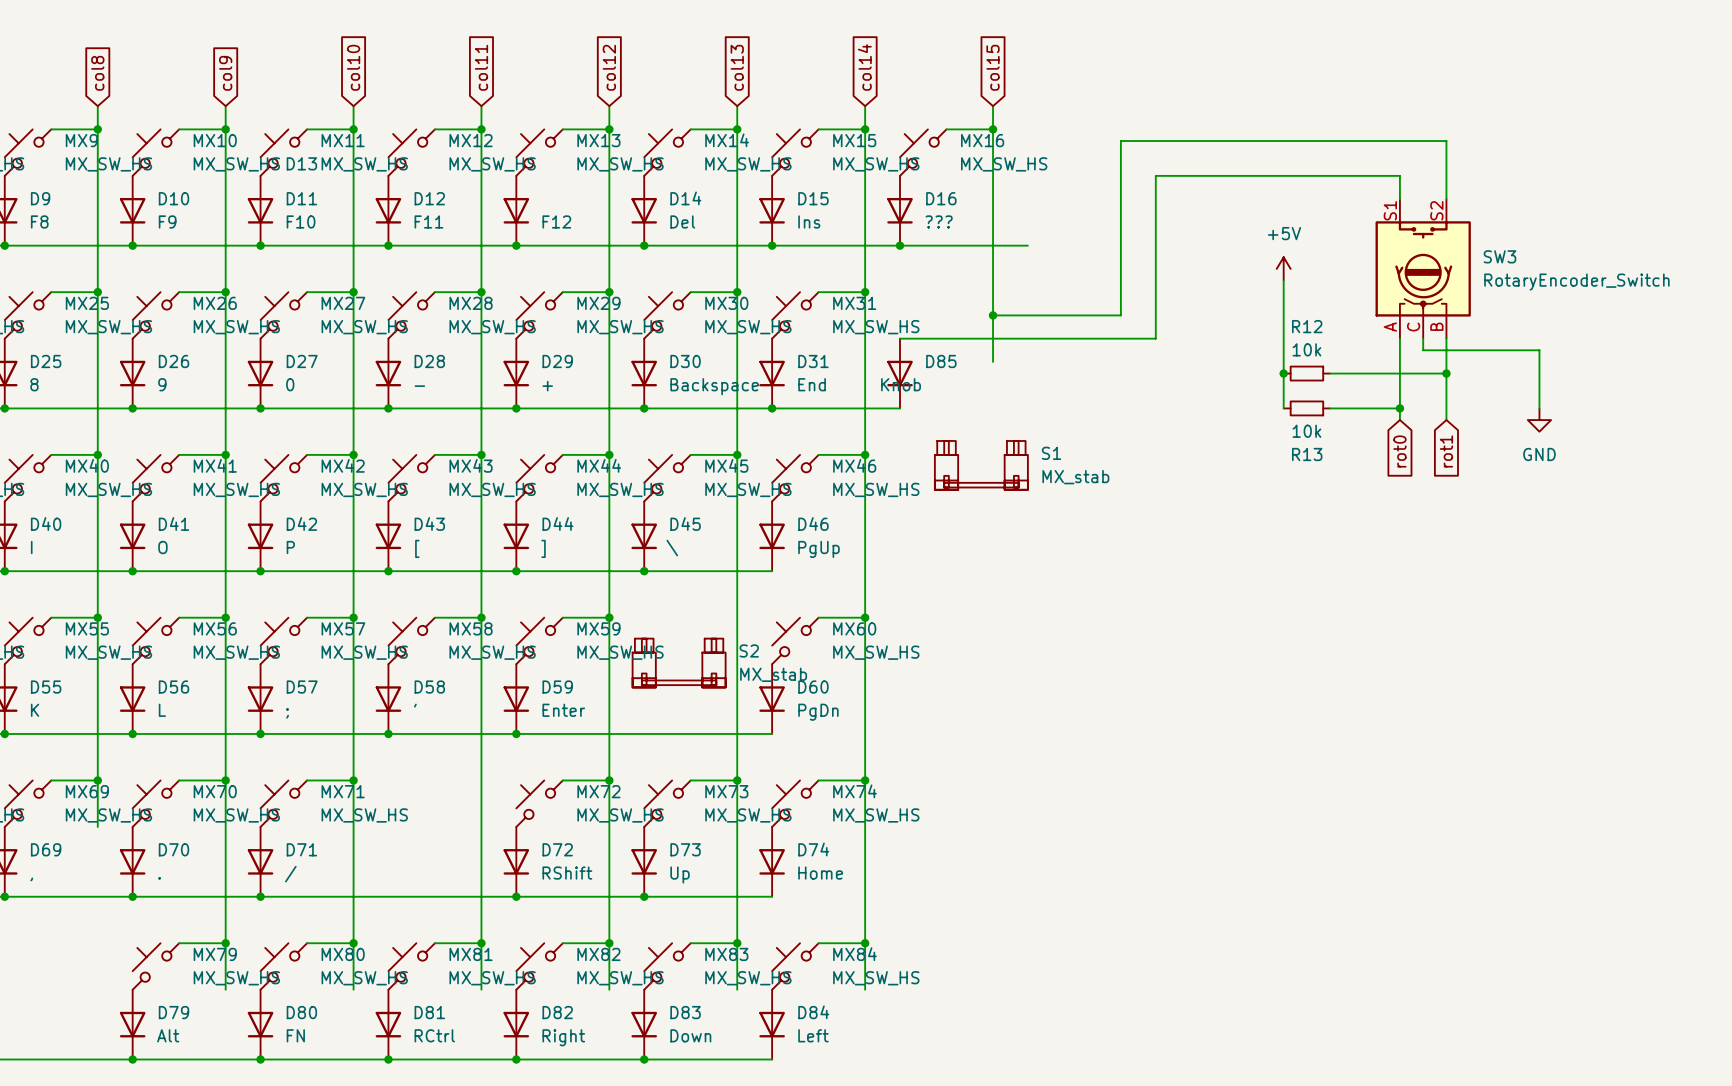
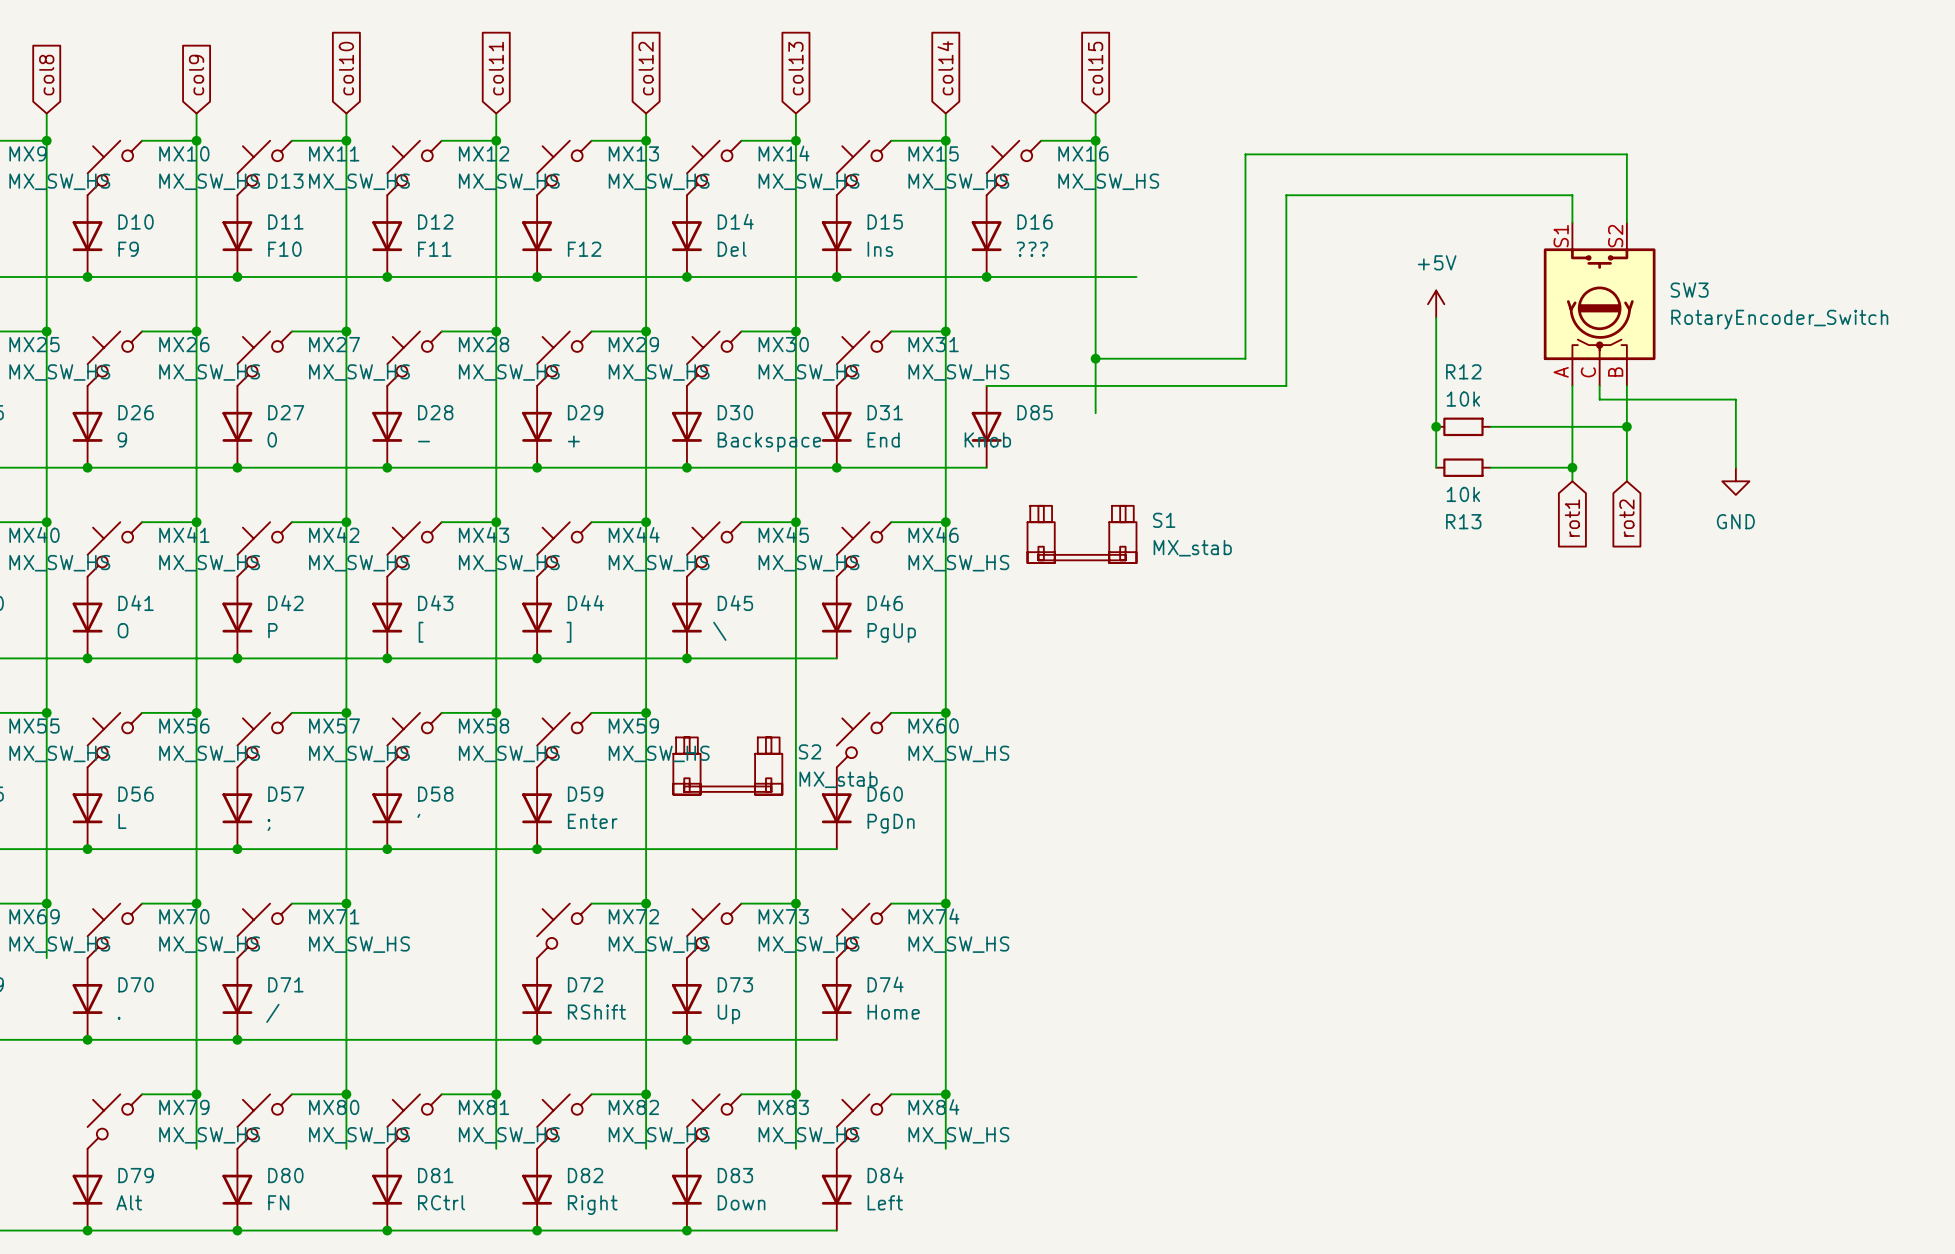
global label: rot0 (1399, 451) -> rot1 (1572, 518)
global label: rot1 (1446, 451) -> rot2 (1626, 518)

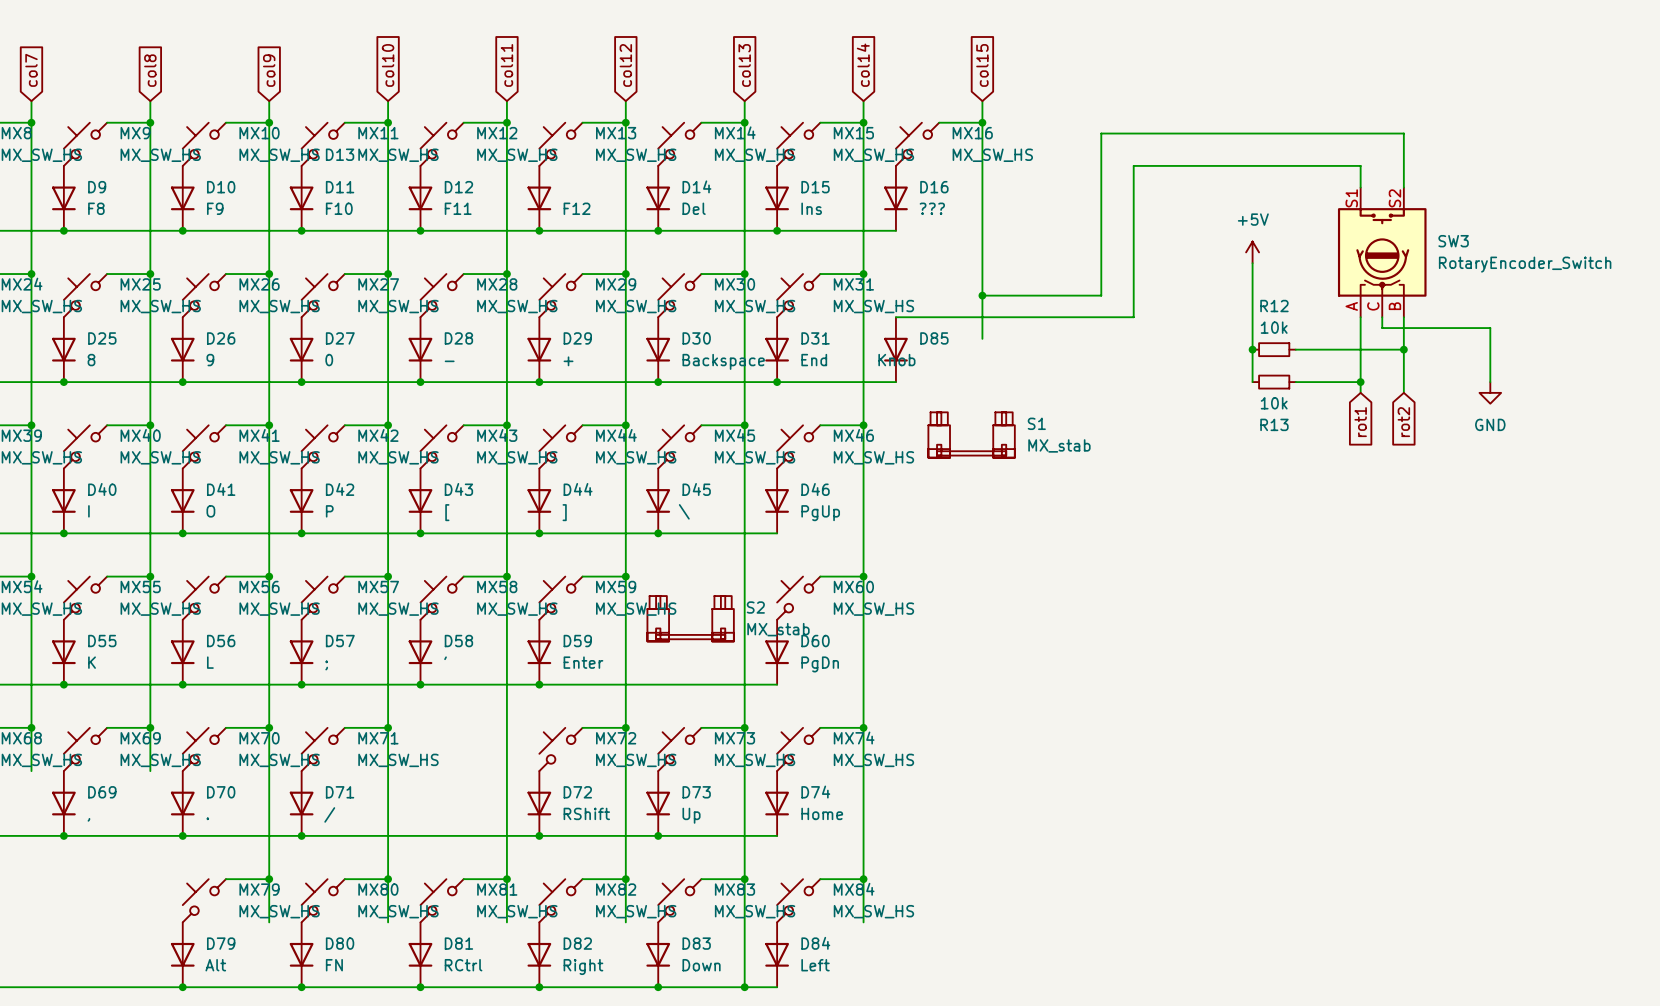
wire: (986, 276) (1136, 276) -> none
junction: (986, 276) -> none
wire: none -> (744, 922) (744, 987)
junction: none -> (744, 987)

